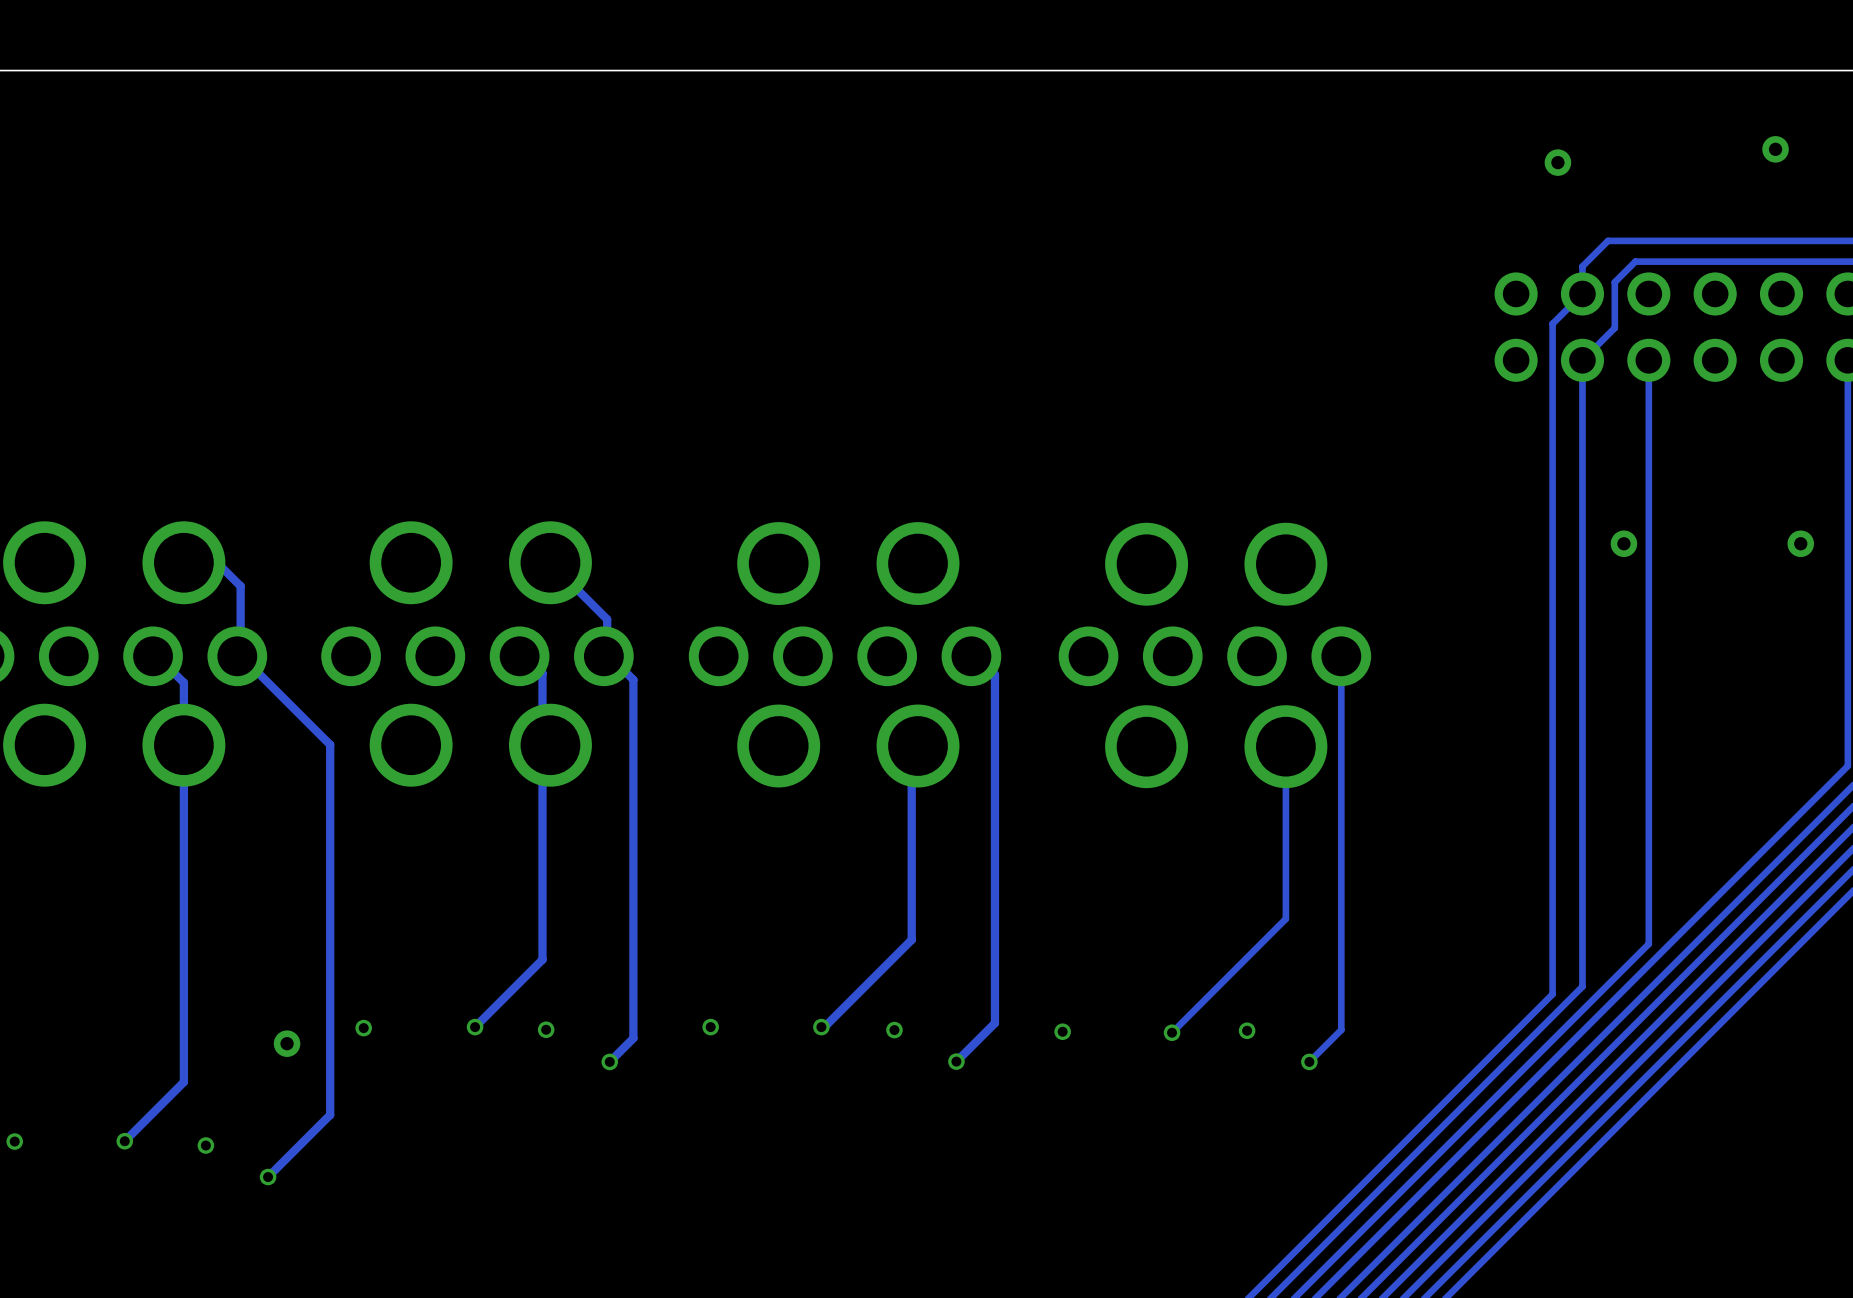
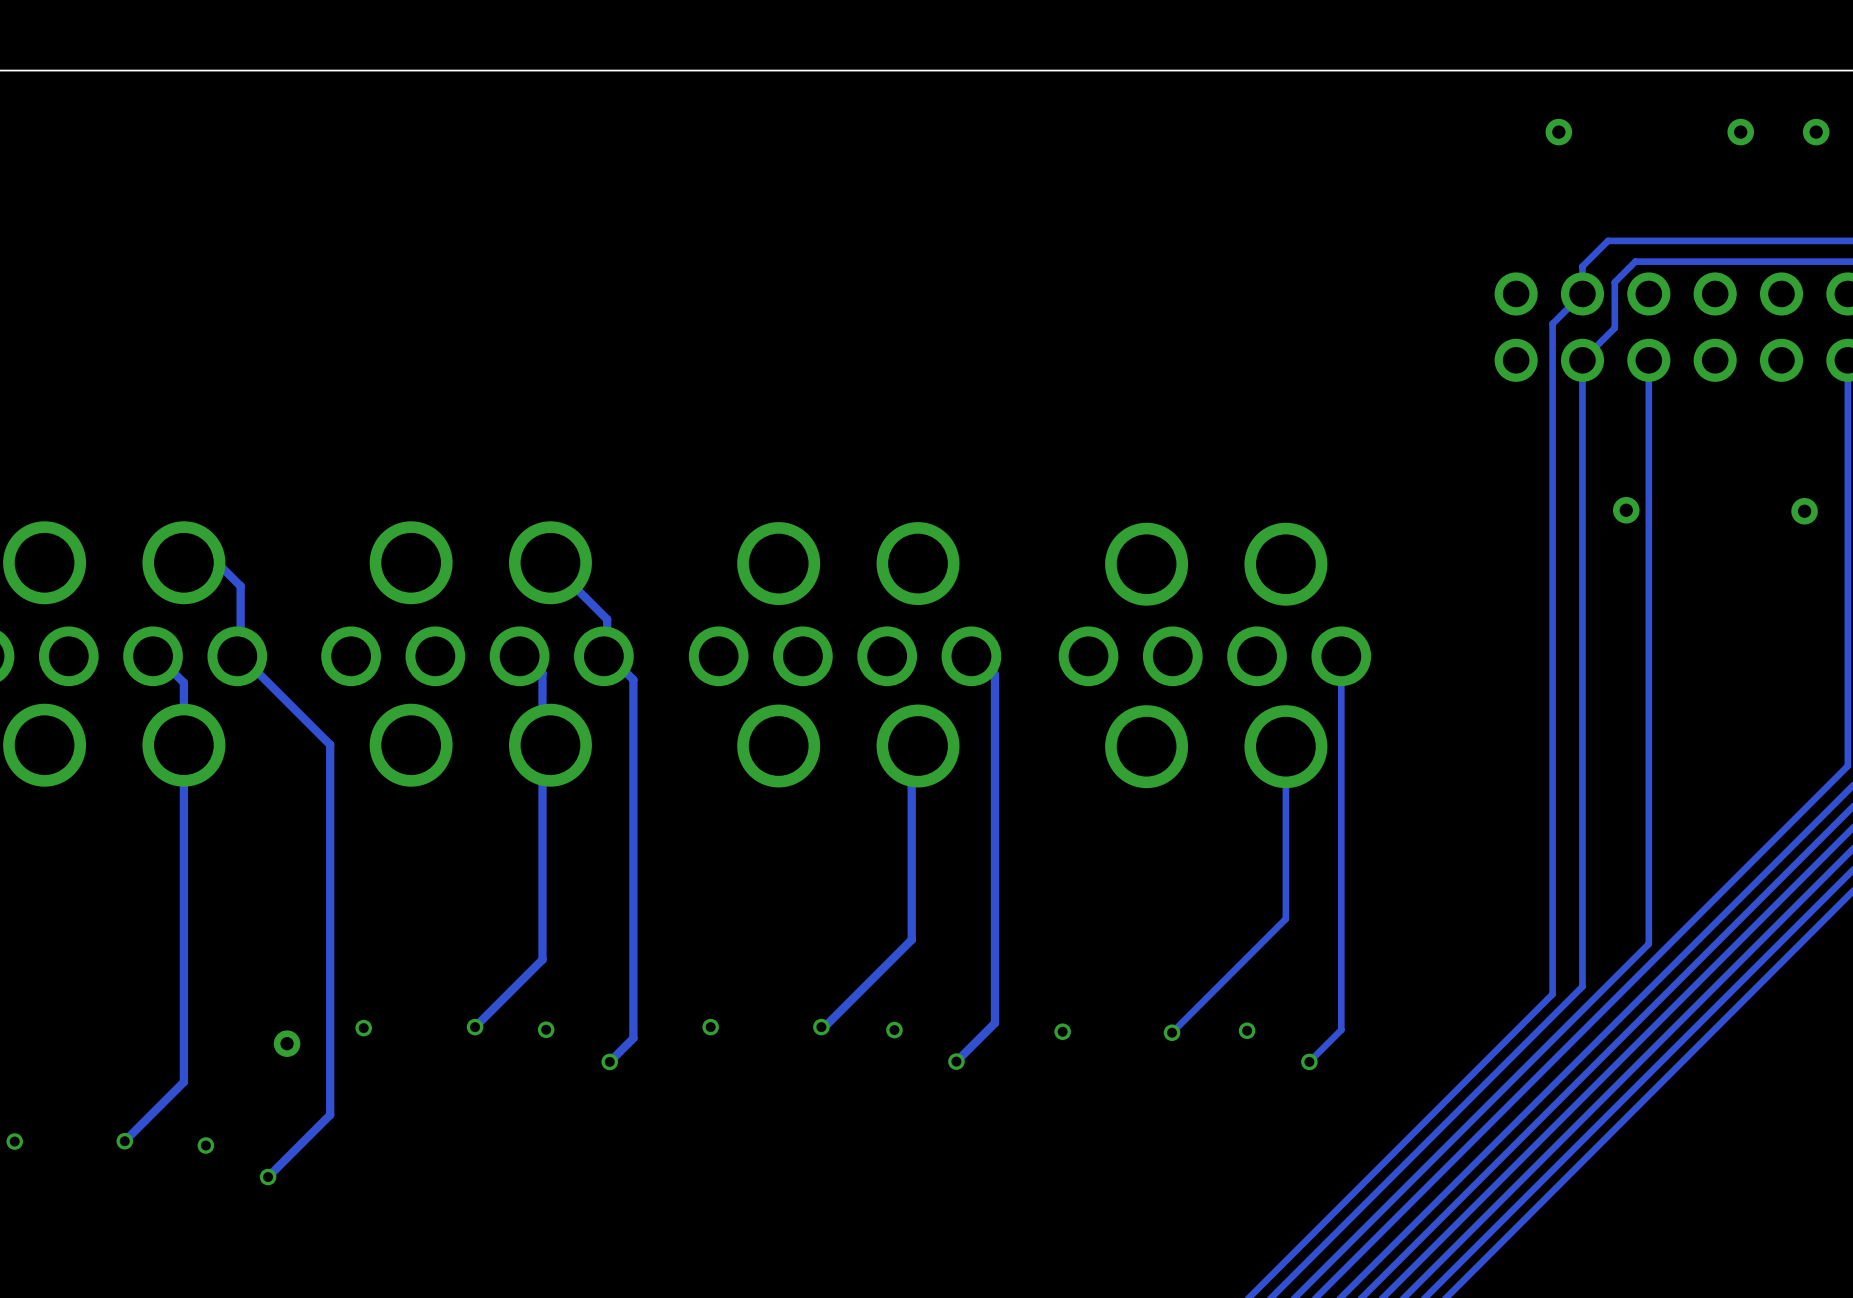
via: none -> (1740, 132)
via: none -> (1816, 132)
via: (1775, 149) -> none
via position: (1557, 162) -> (1558, 132)
via position: (1623, 543) -> (1626, 510)
via position: (1800, 543) -> (1804, 511)

